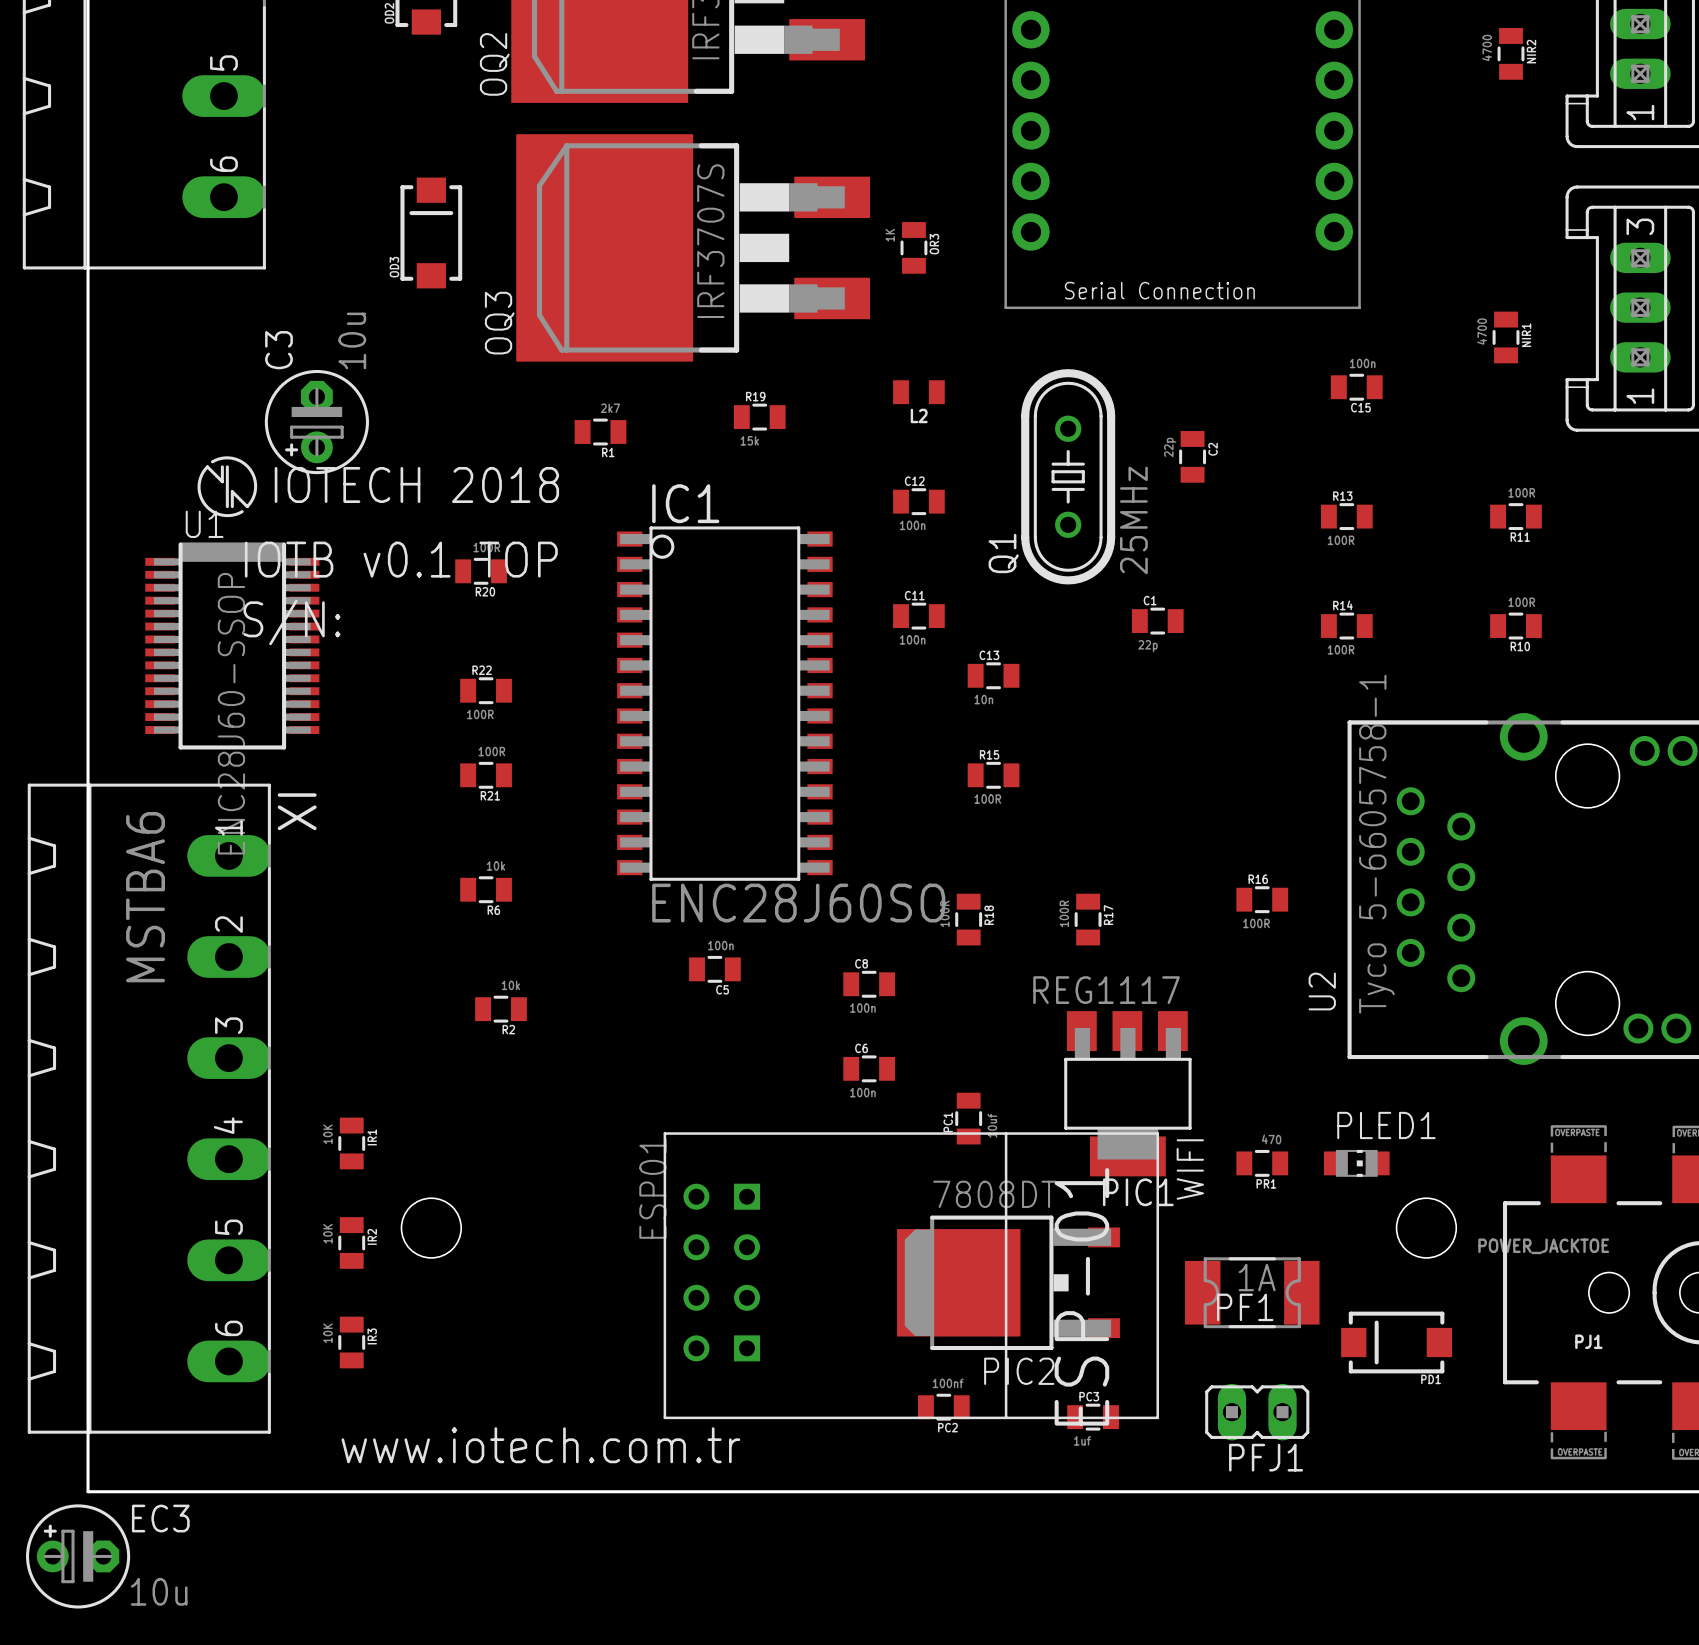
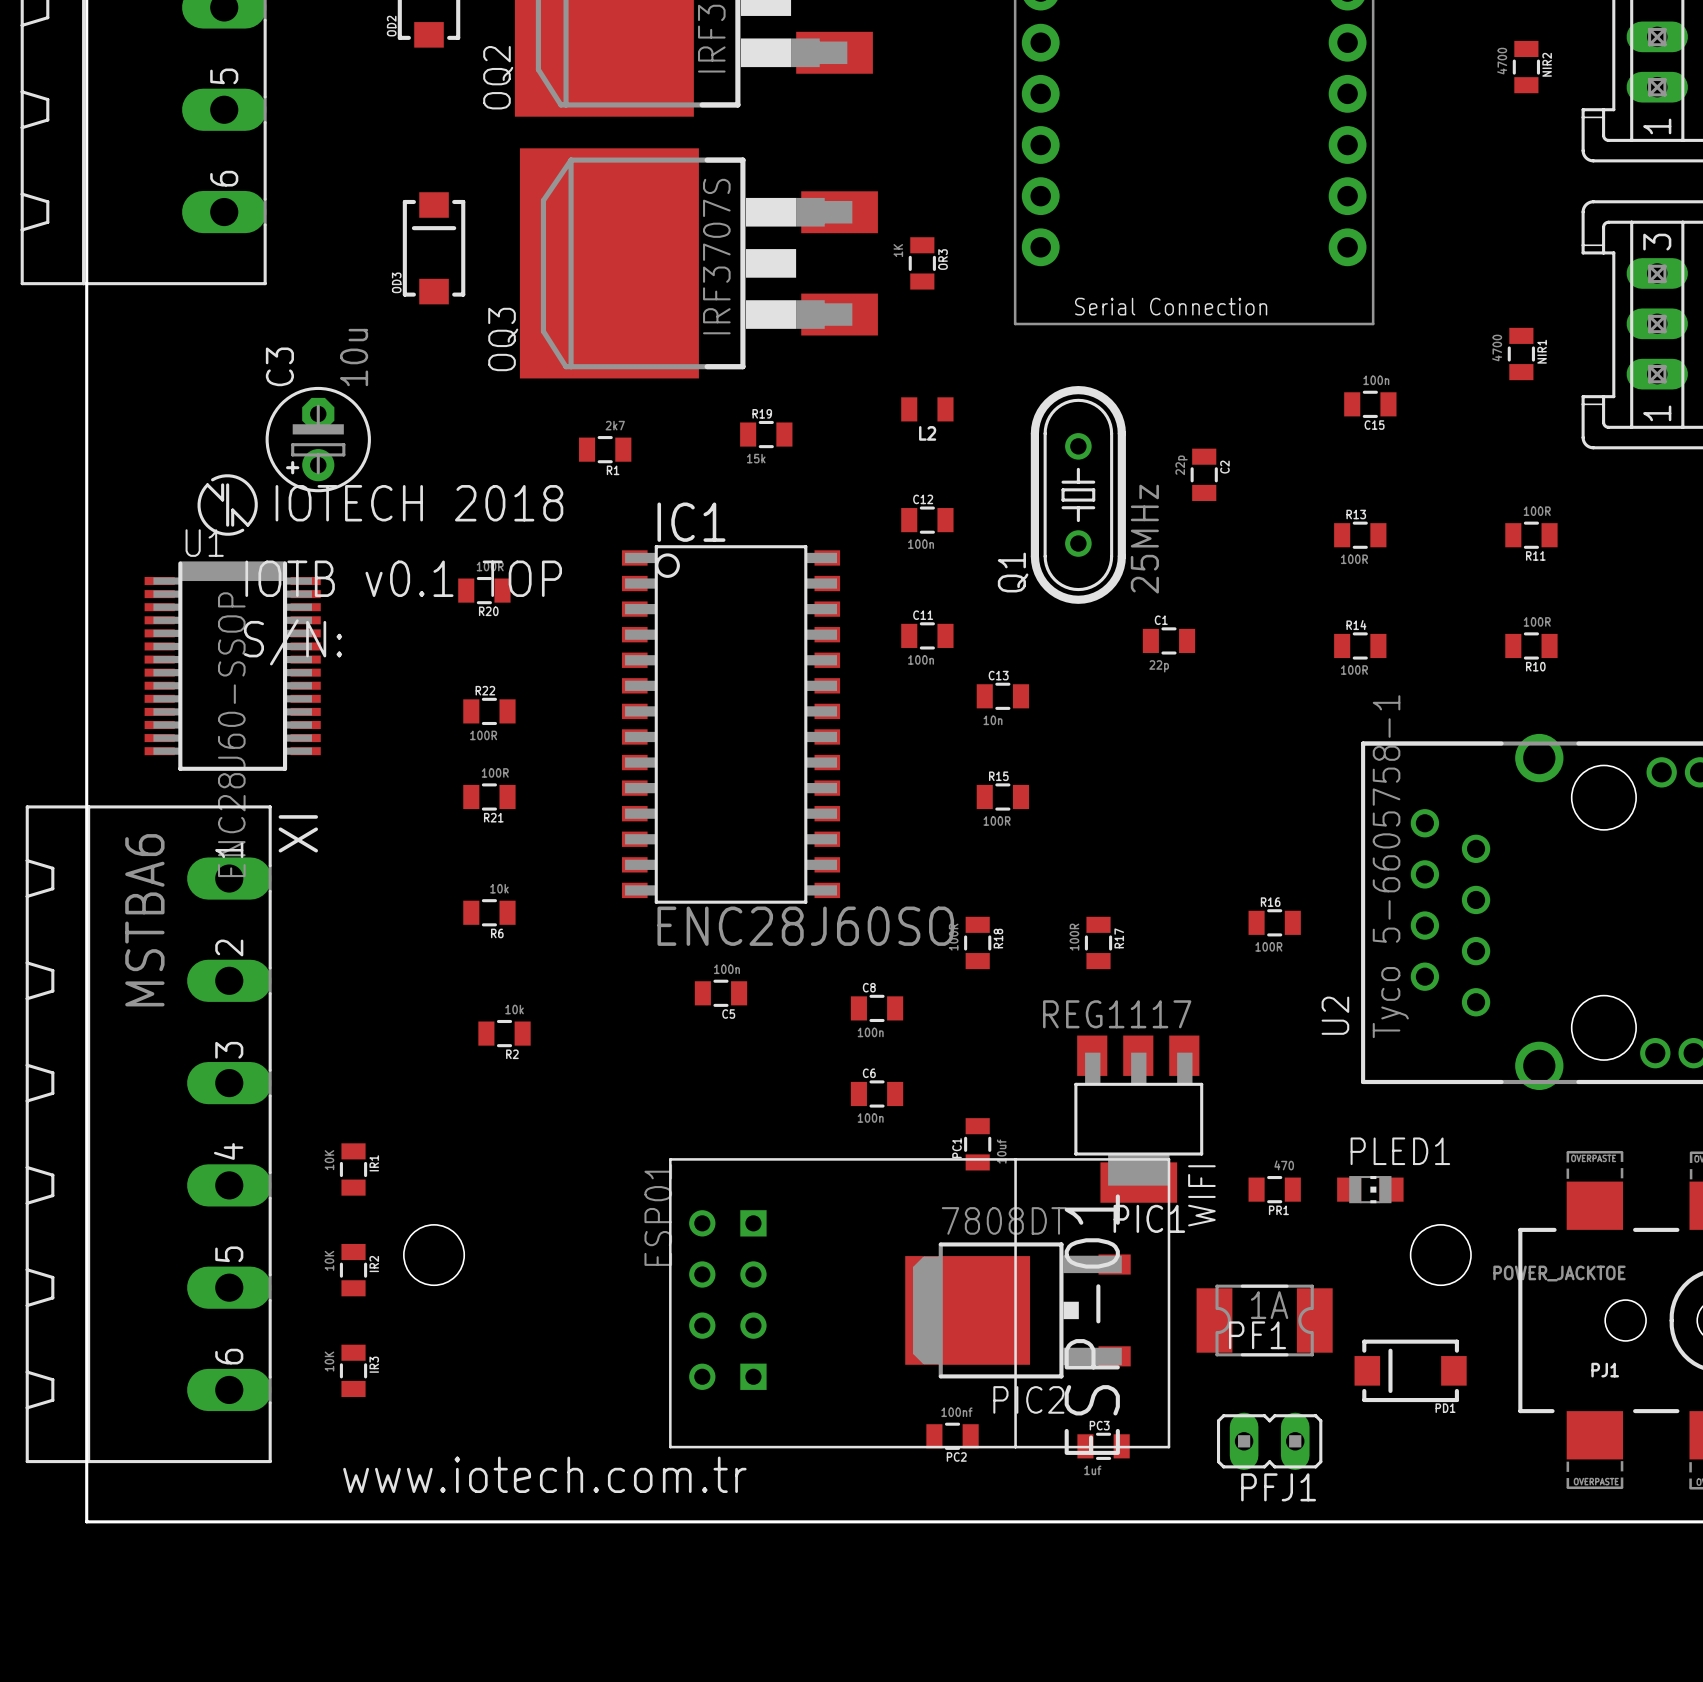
EC3: 10u (78, 1556) -> none

